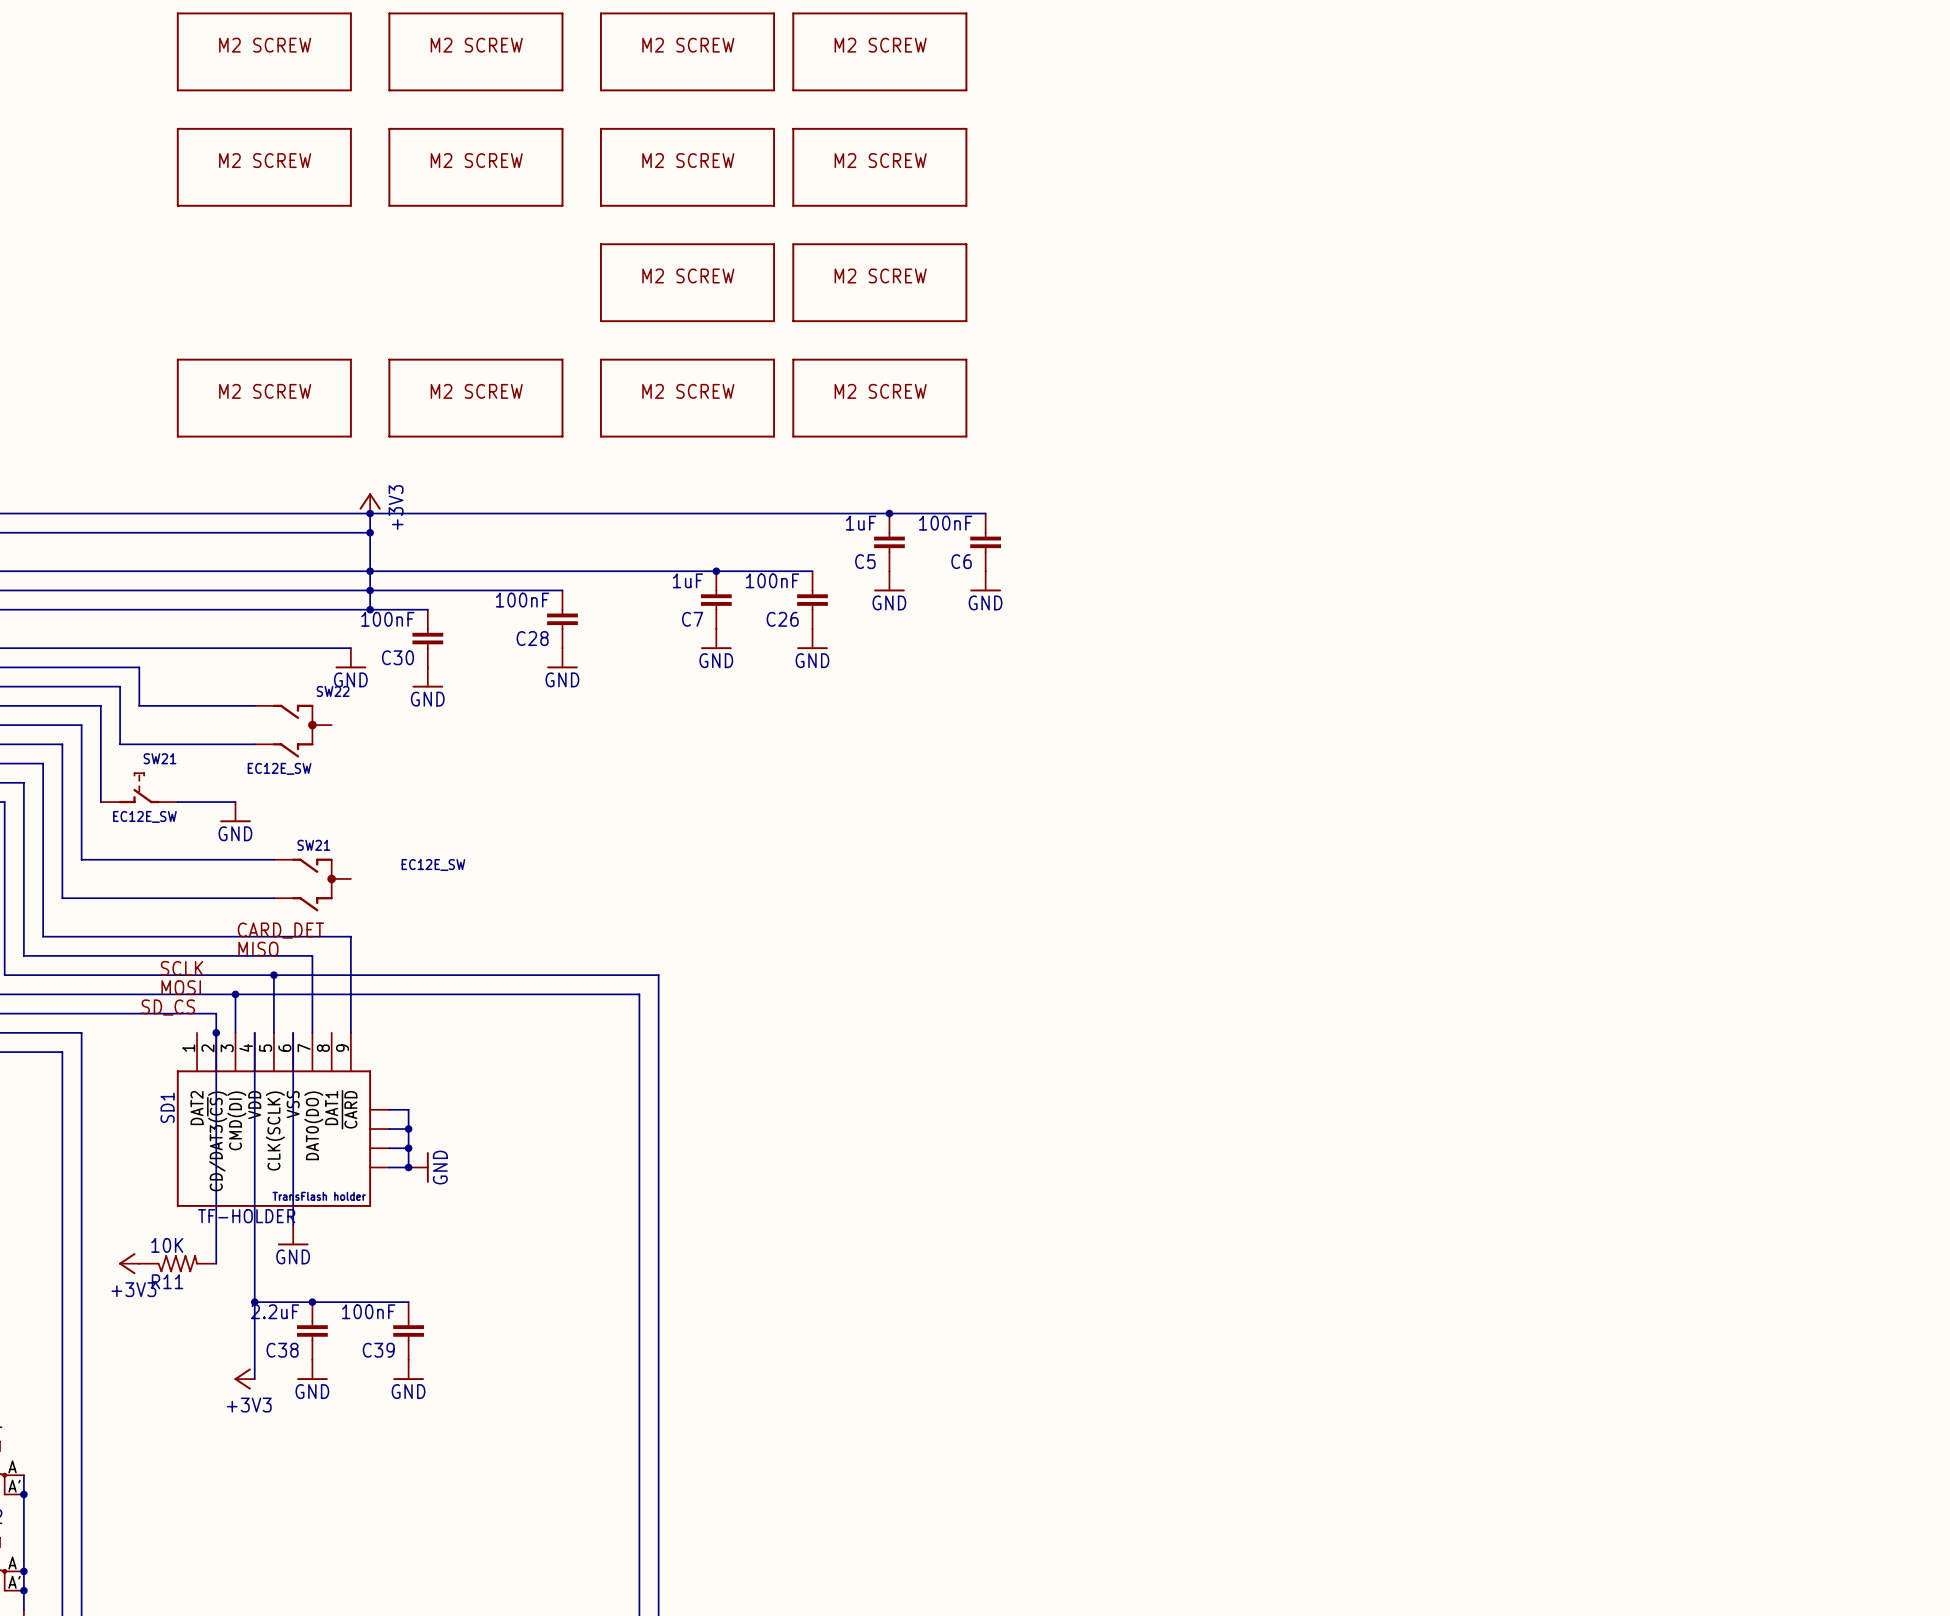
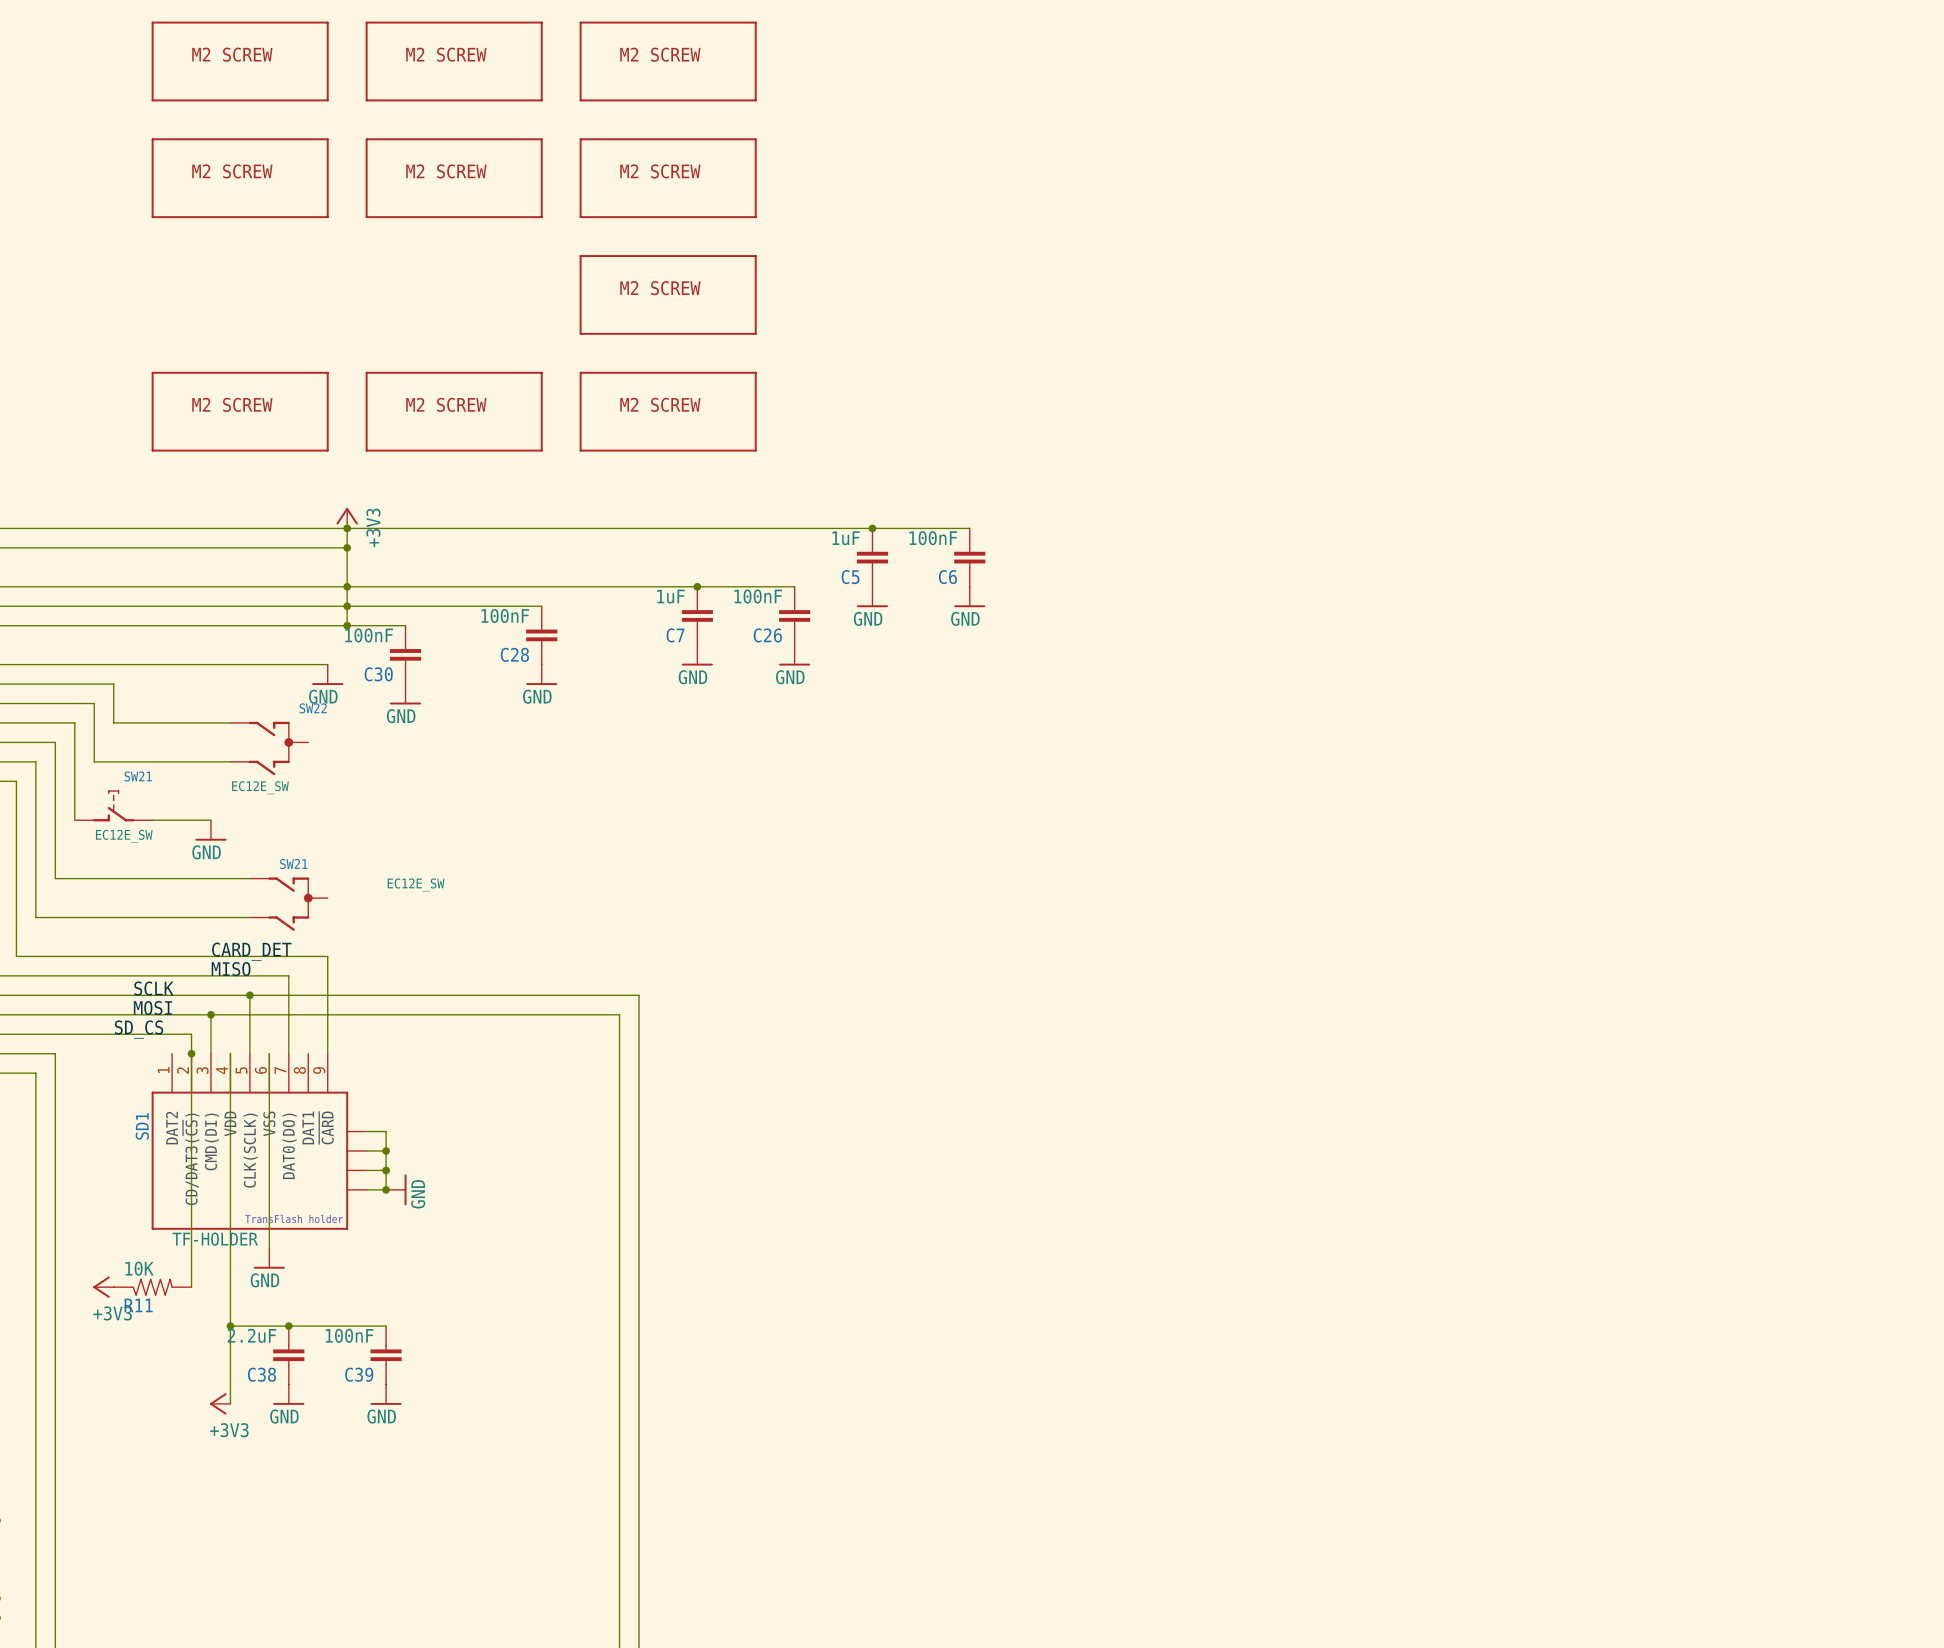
part: (879, 51) -> none
part: (879, 167) -> none
part: (879, 282) -> none
part: (879, 398) -> none

